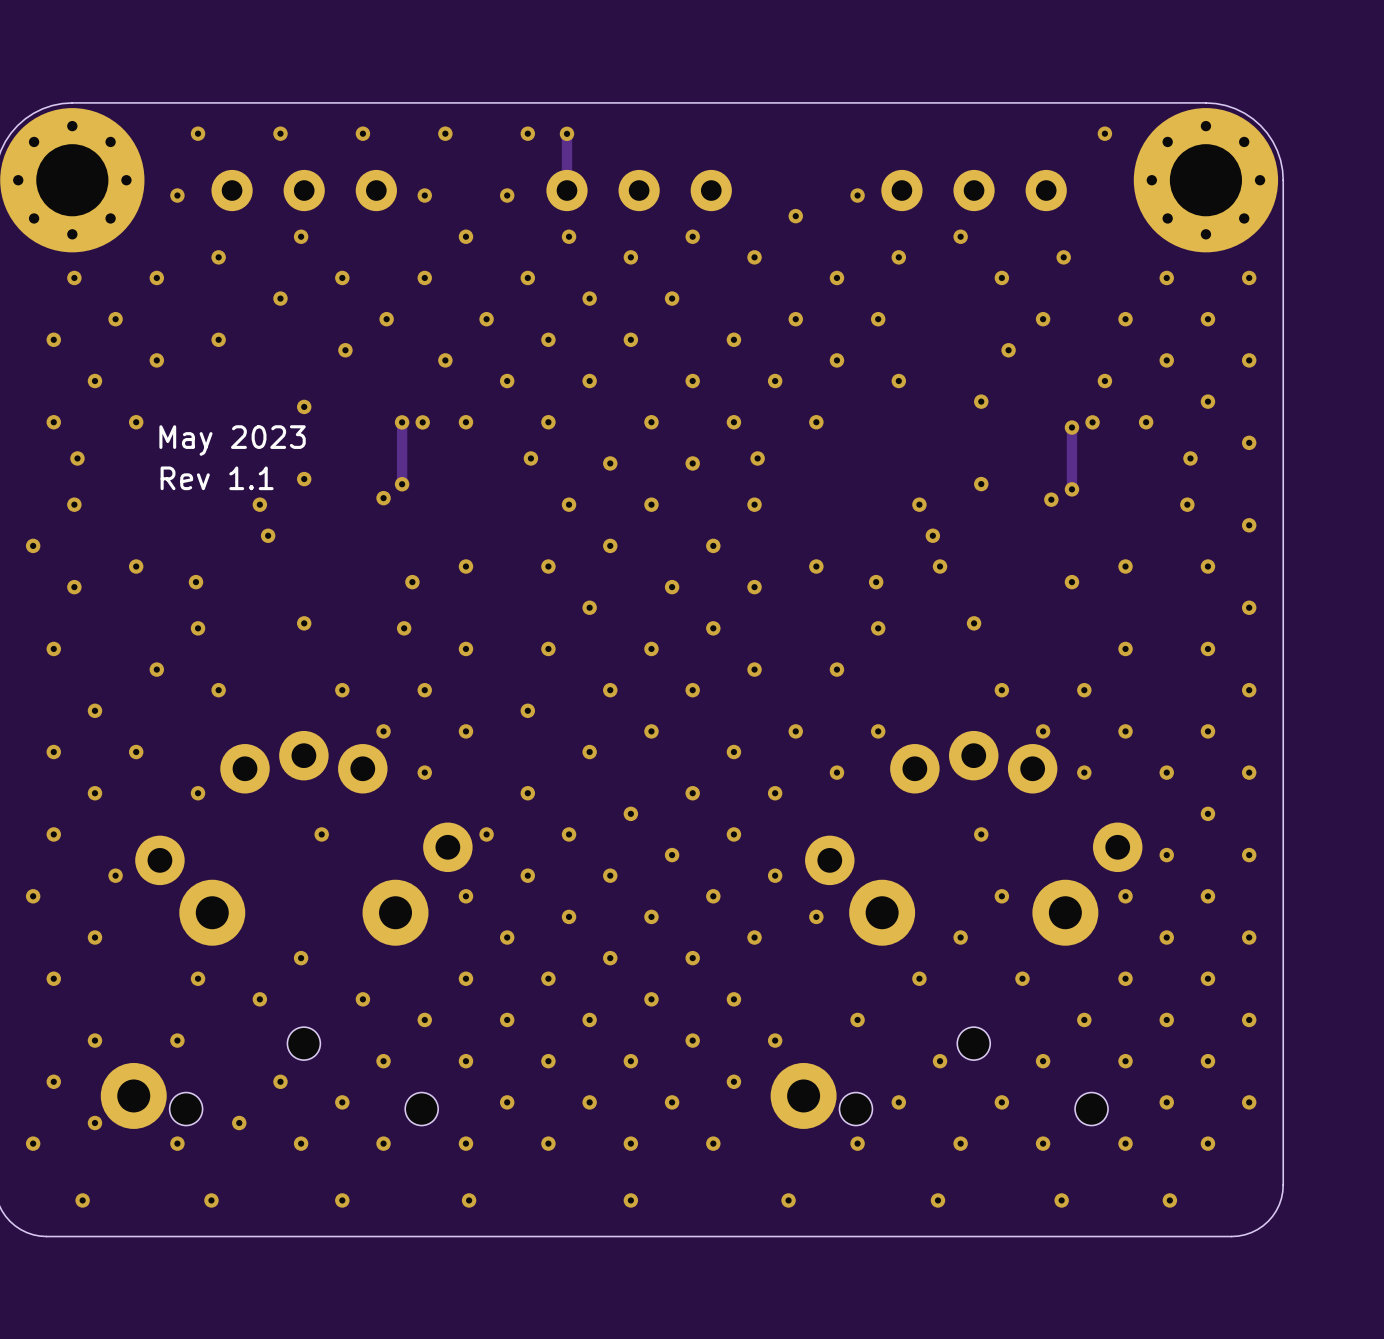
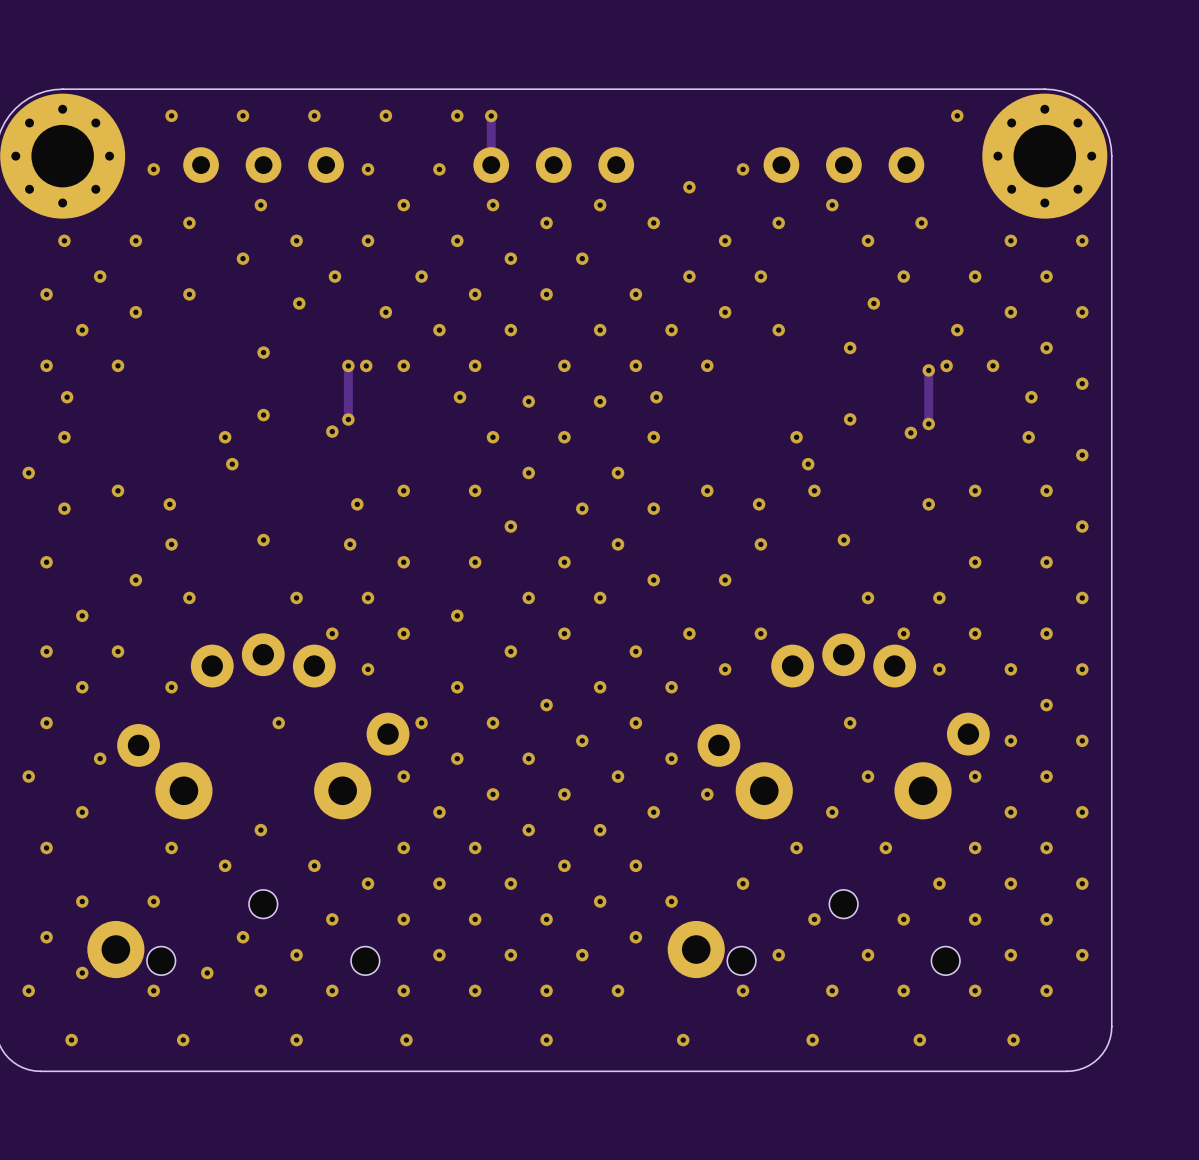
text: May 2023 (232, 440) -> none
text: Rev 1.1 (217, 478) -> none

